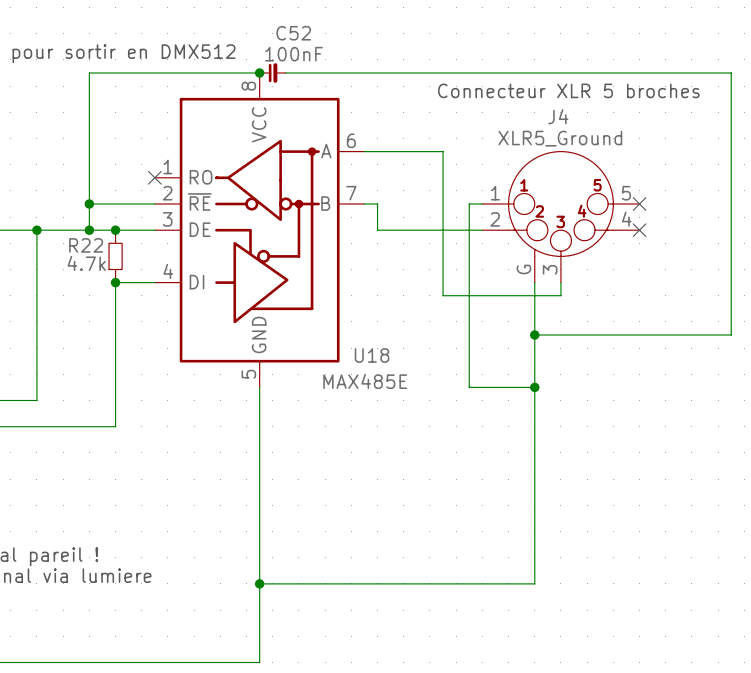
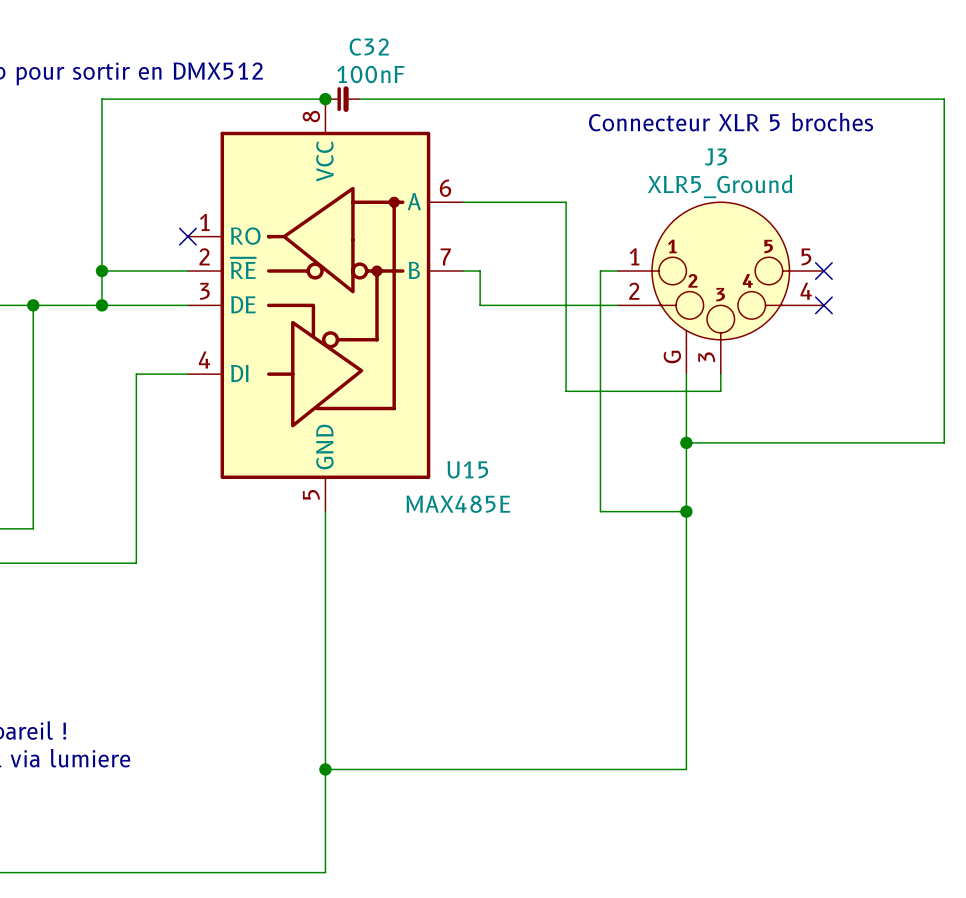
C52 name: C52 (293, 33) -> C32 (369, 47)
J4 name: J4 (558, 116) -> J3 (715, 157)
junction: (115, 230) -> none
R22: 4.7k (115, 256) -> none
junction: (115, 282) -> none
U18 name: U18 (372, 355) -> U15 (467, 469)

